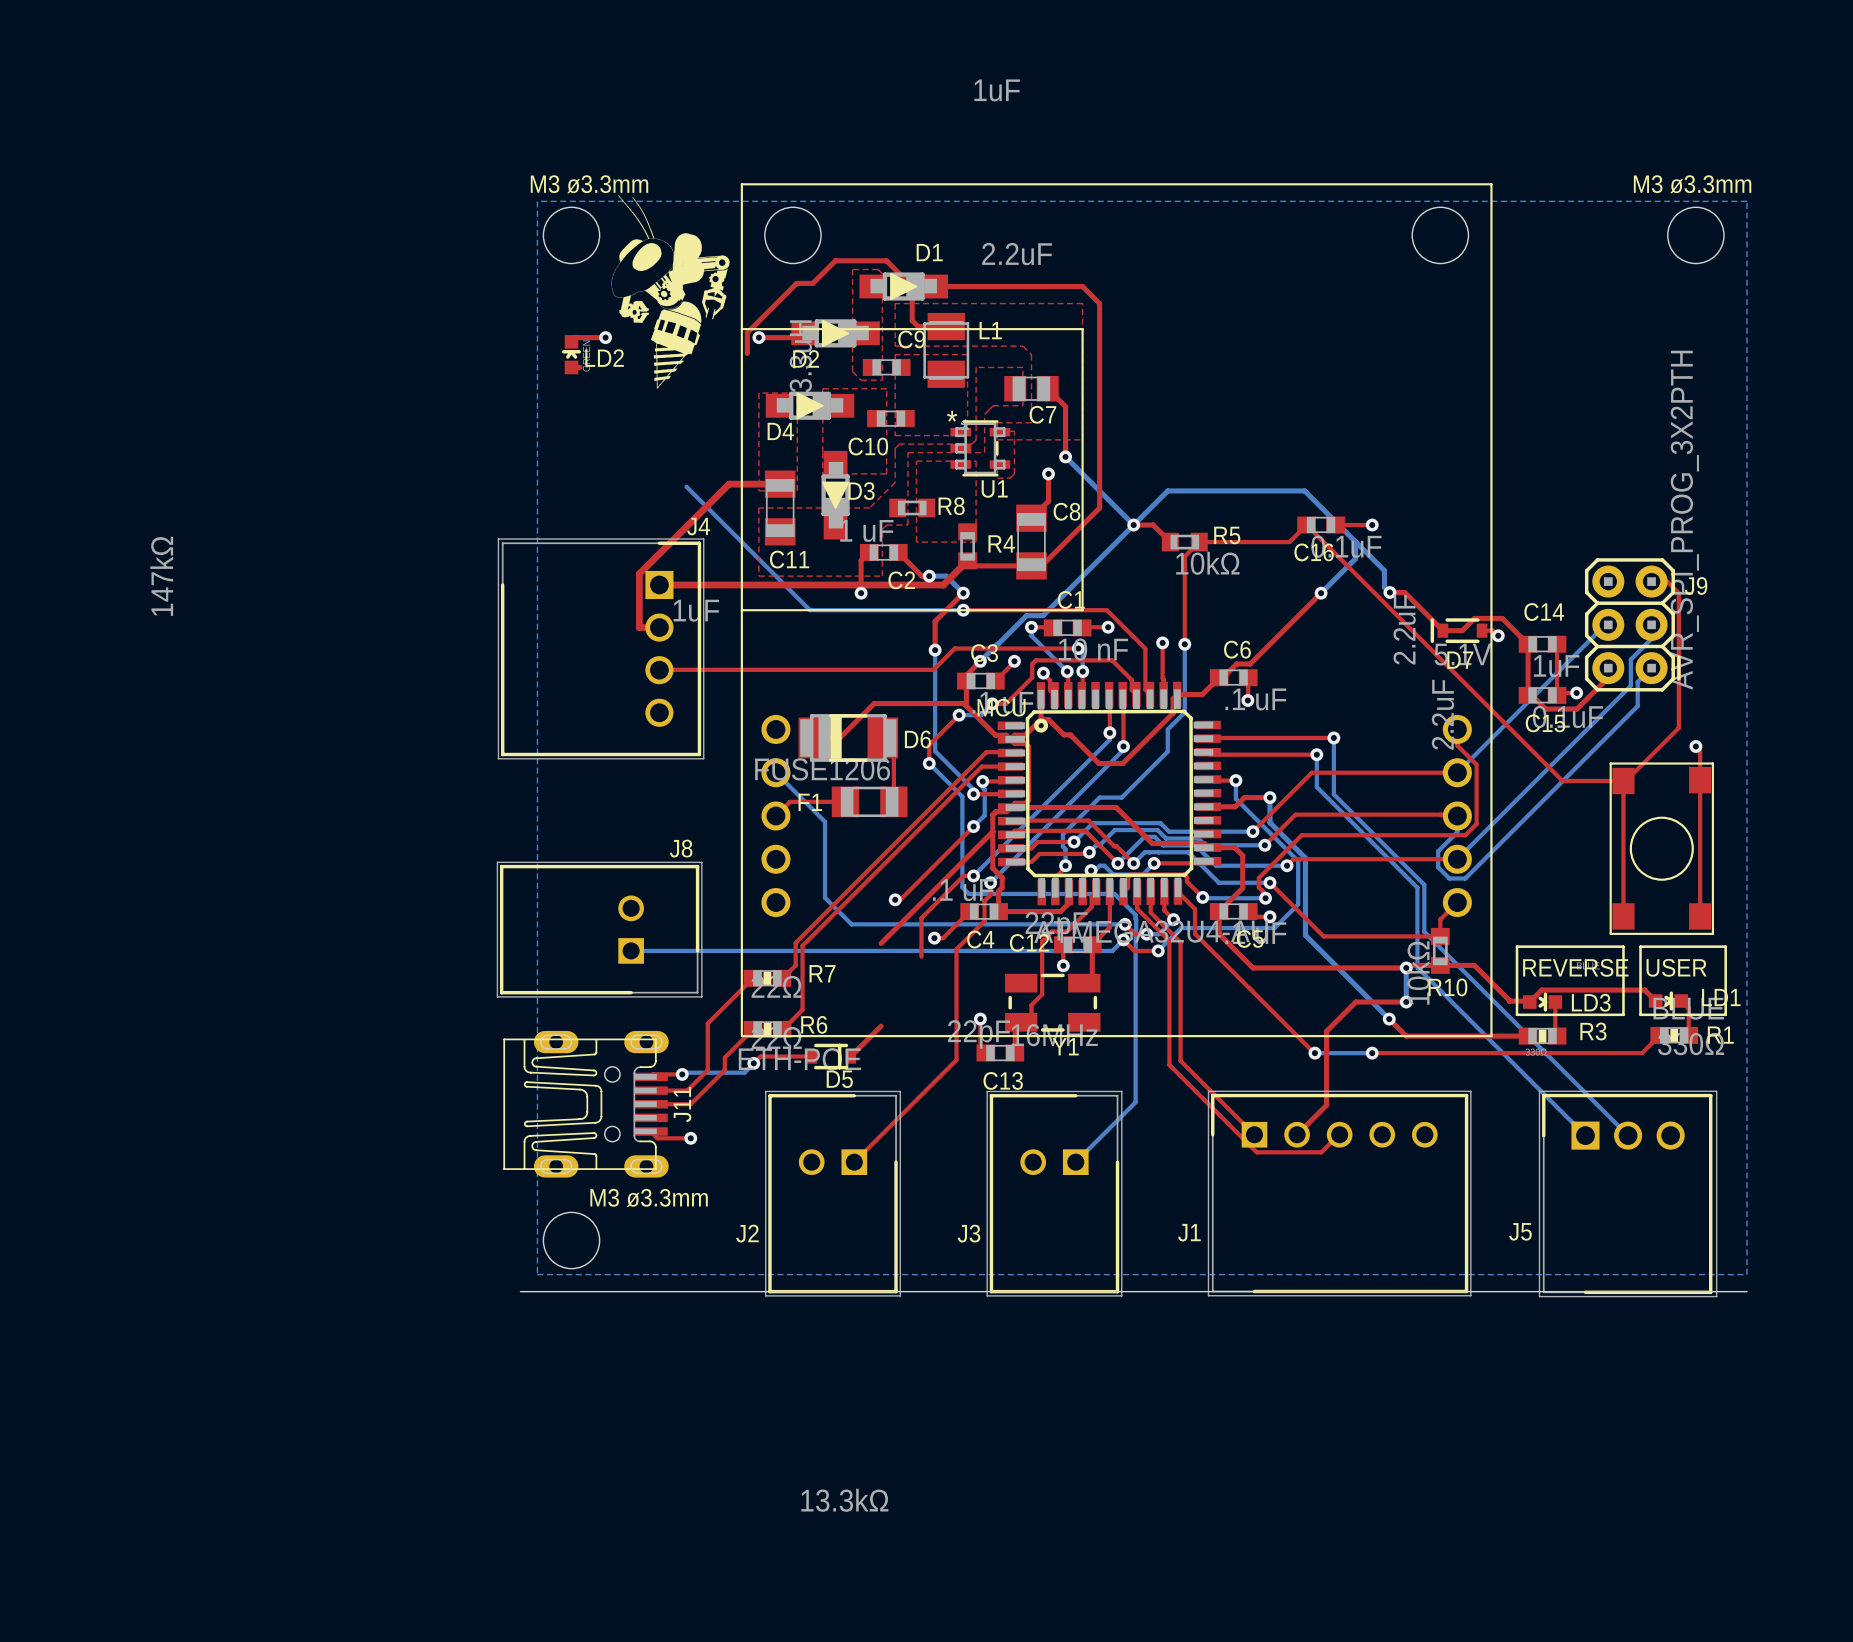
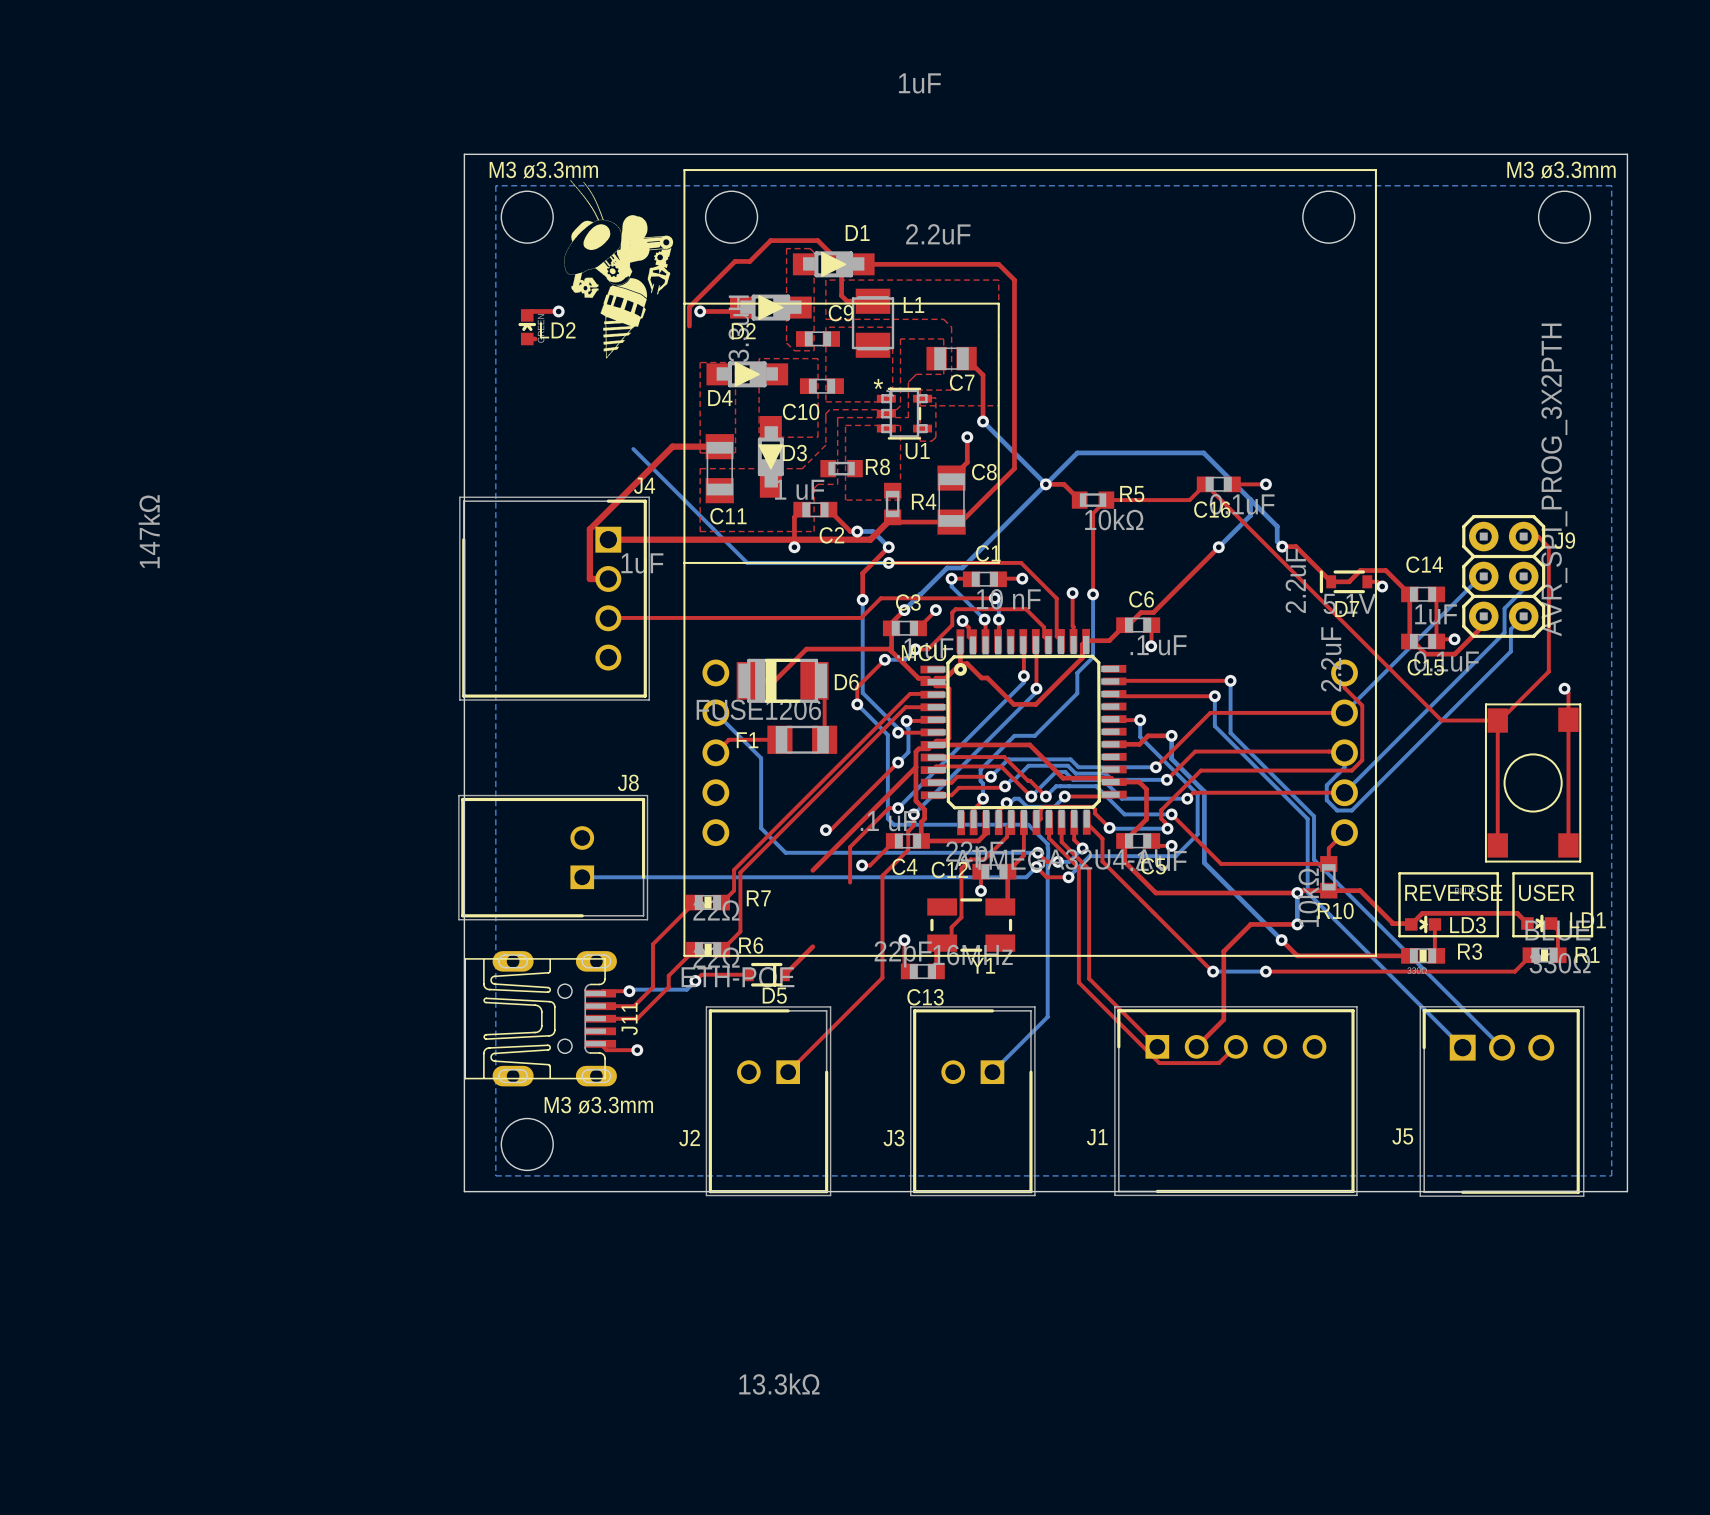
board edge: none -> (480, 1191) (464, 1191) (464, 154) (1627, 154) (1627, 1191) (1611, 1191)

